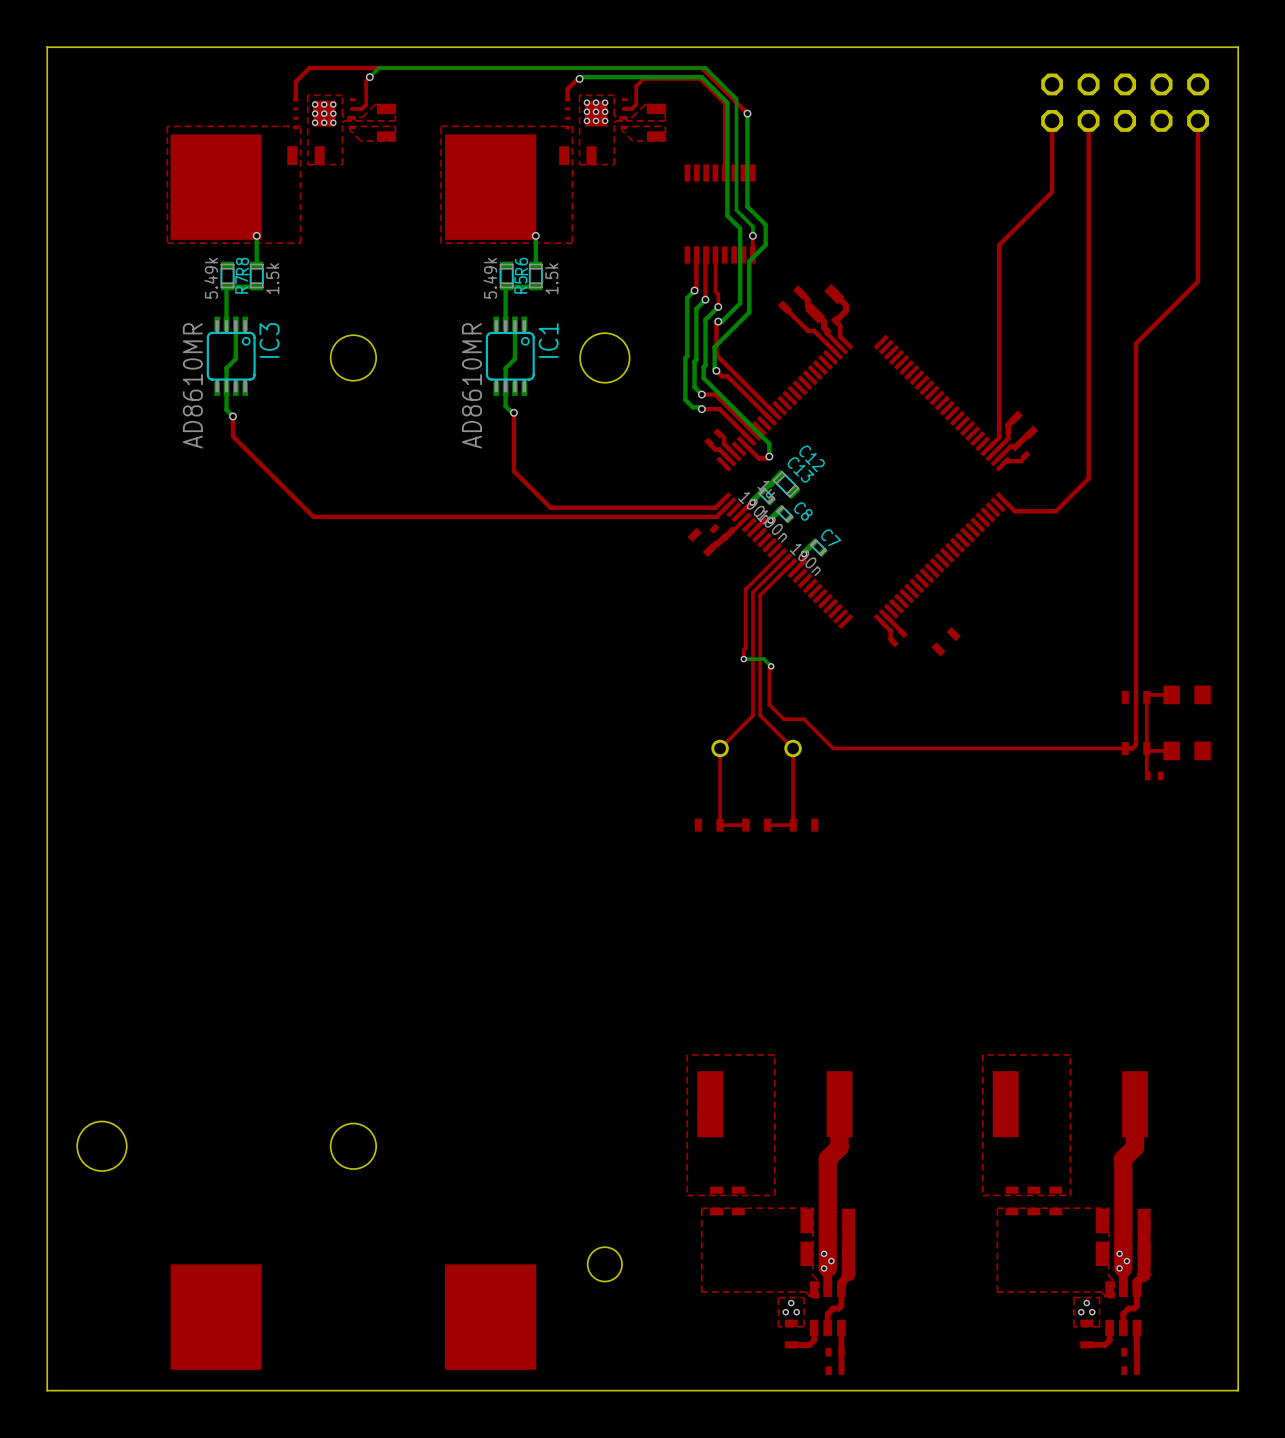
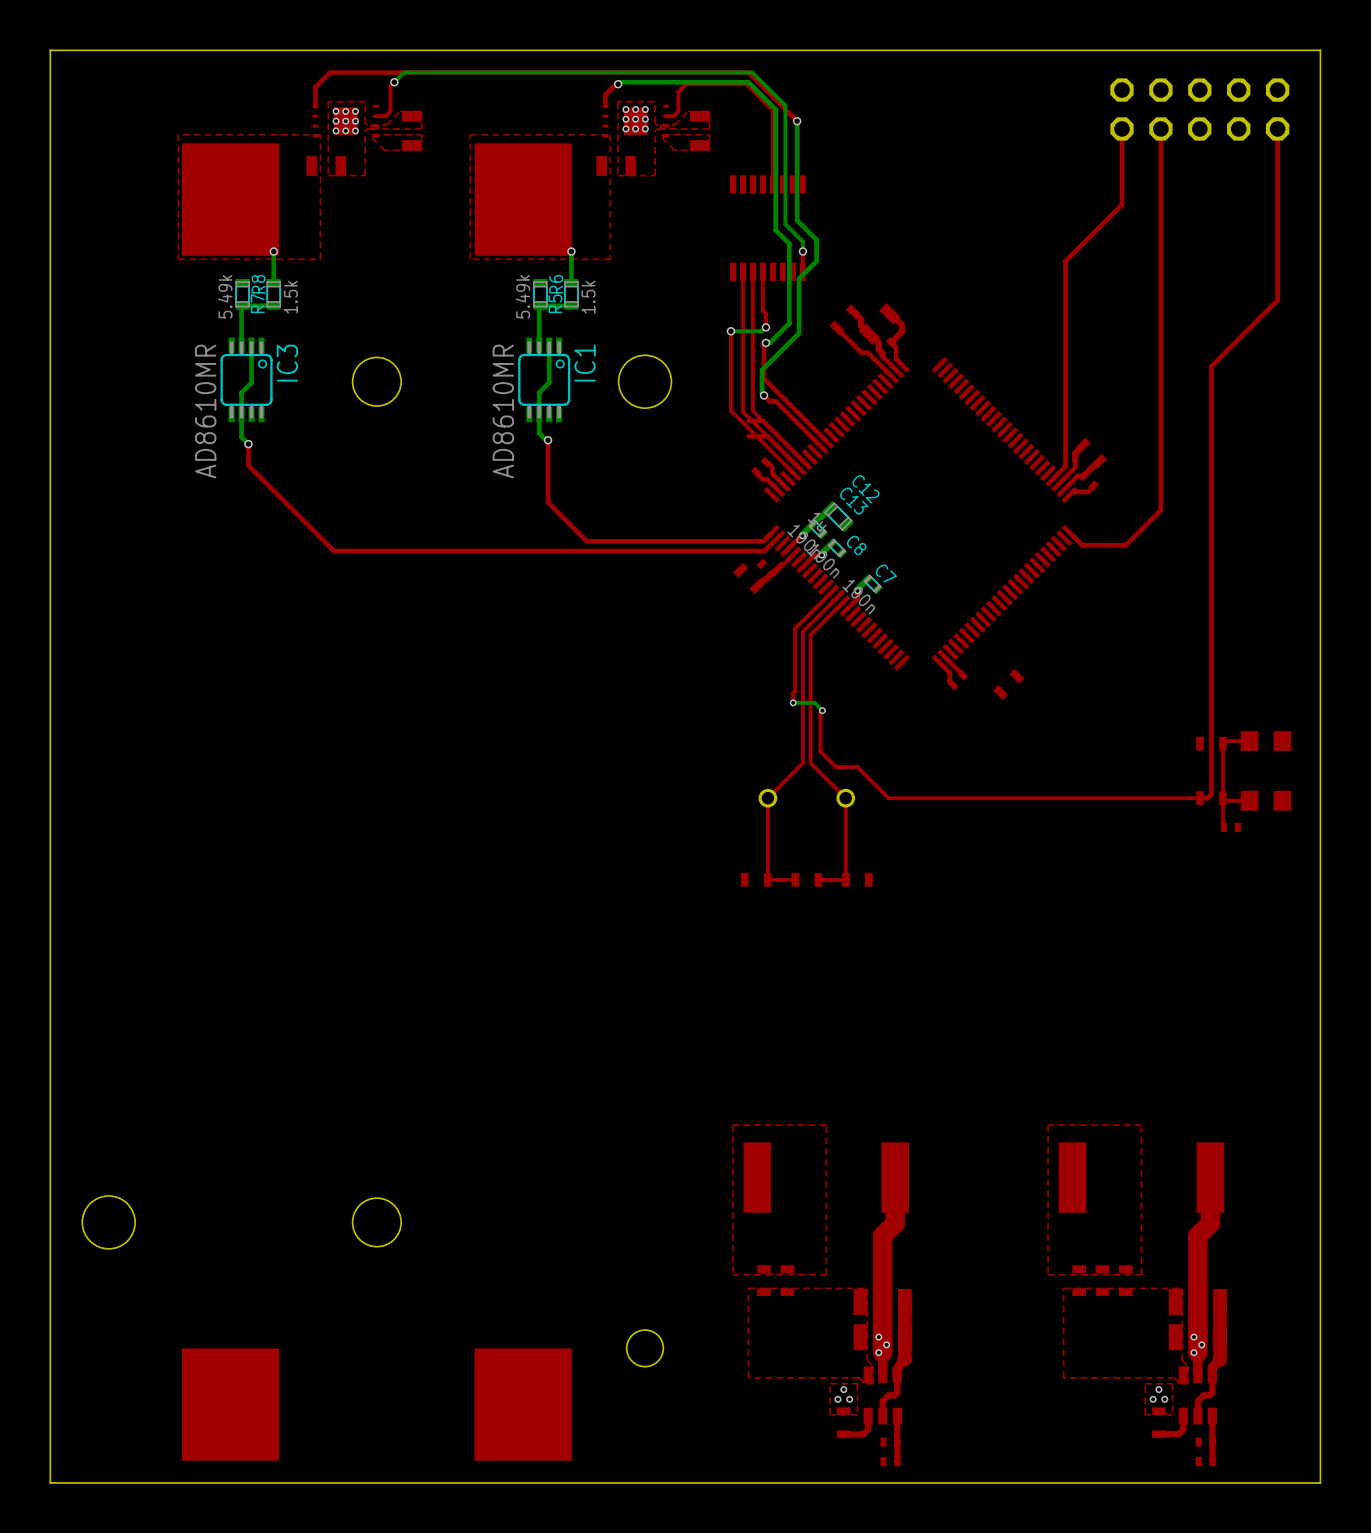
top track: (696, 254) (696, 288) (694, 290) -> (743, 271) (743, 411) (767, 436)
top track: (706, 254) (705, 299) -> (752, 271) (752, 410) (762, 420)
bottom track: (694, 290) (687, 297) (685, 400) (692, 407) (701, 409) -> none
via: (694, 290) -> none
bottom track: (705, 299) (696, 308) (694, 387) (701, 394) -> none
via: (705, 299) -> none
via: none -> (730, 331)
bottom track: (714, 310) (705, 319) (703, 378) (769, 443) (769, 456) -> (762, 331) (730, 331)
via: (701, 394) -> none
via: (701, 409) -> none
top track: (744, 443) (758, 458) (769, 456) -> (793, 473) (730, 410) (730, 331)
via: (769, 456) -> none

